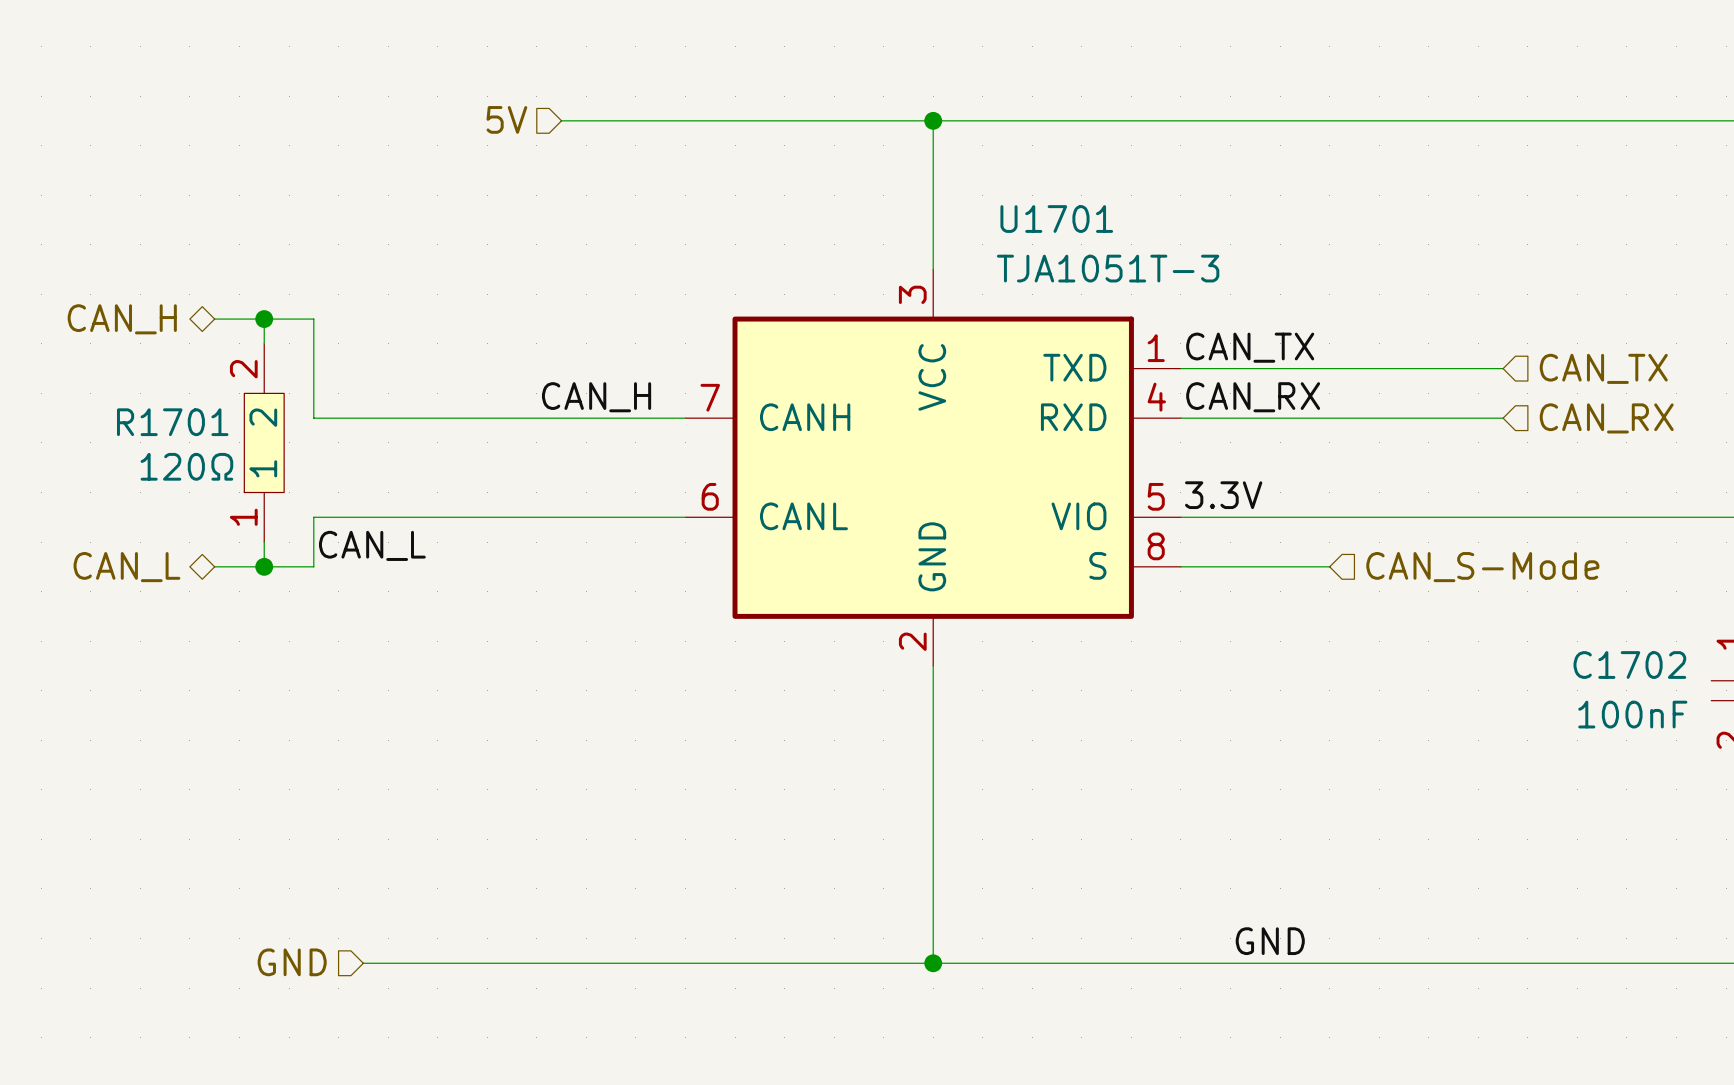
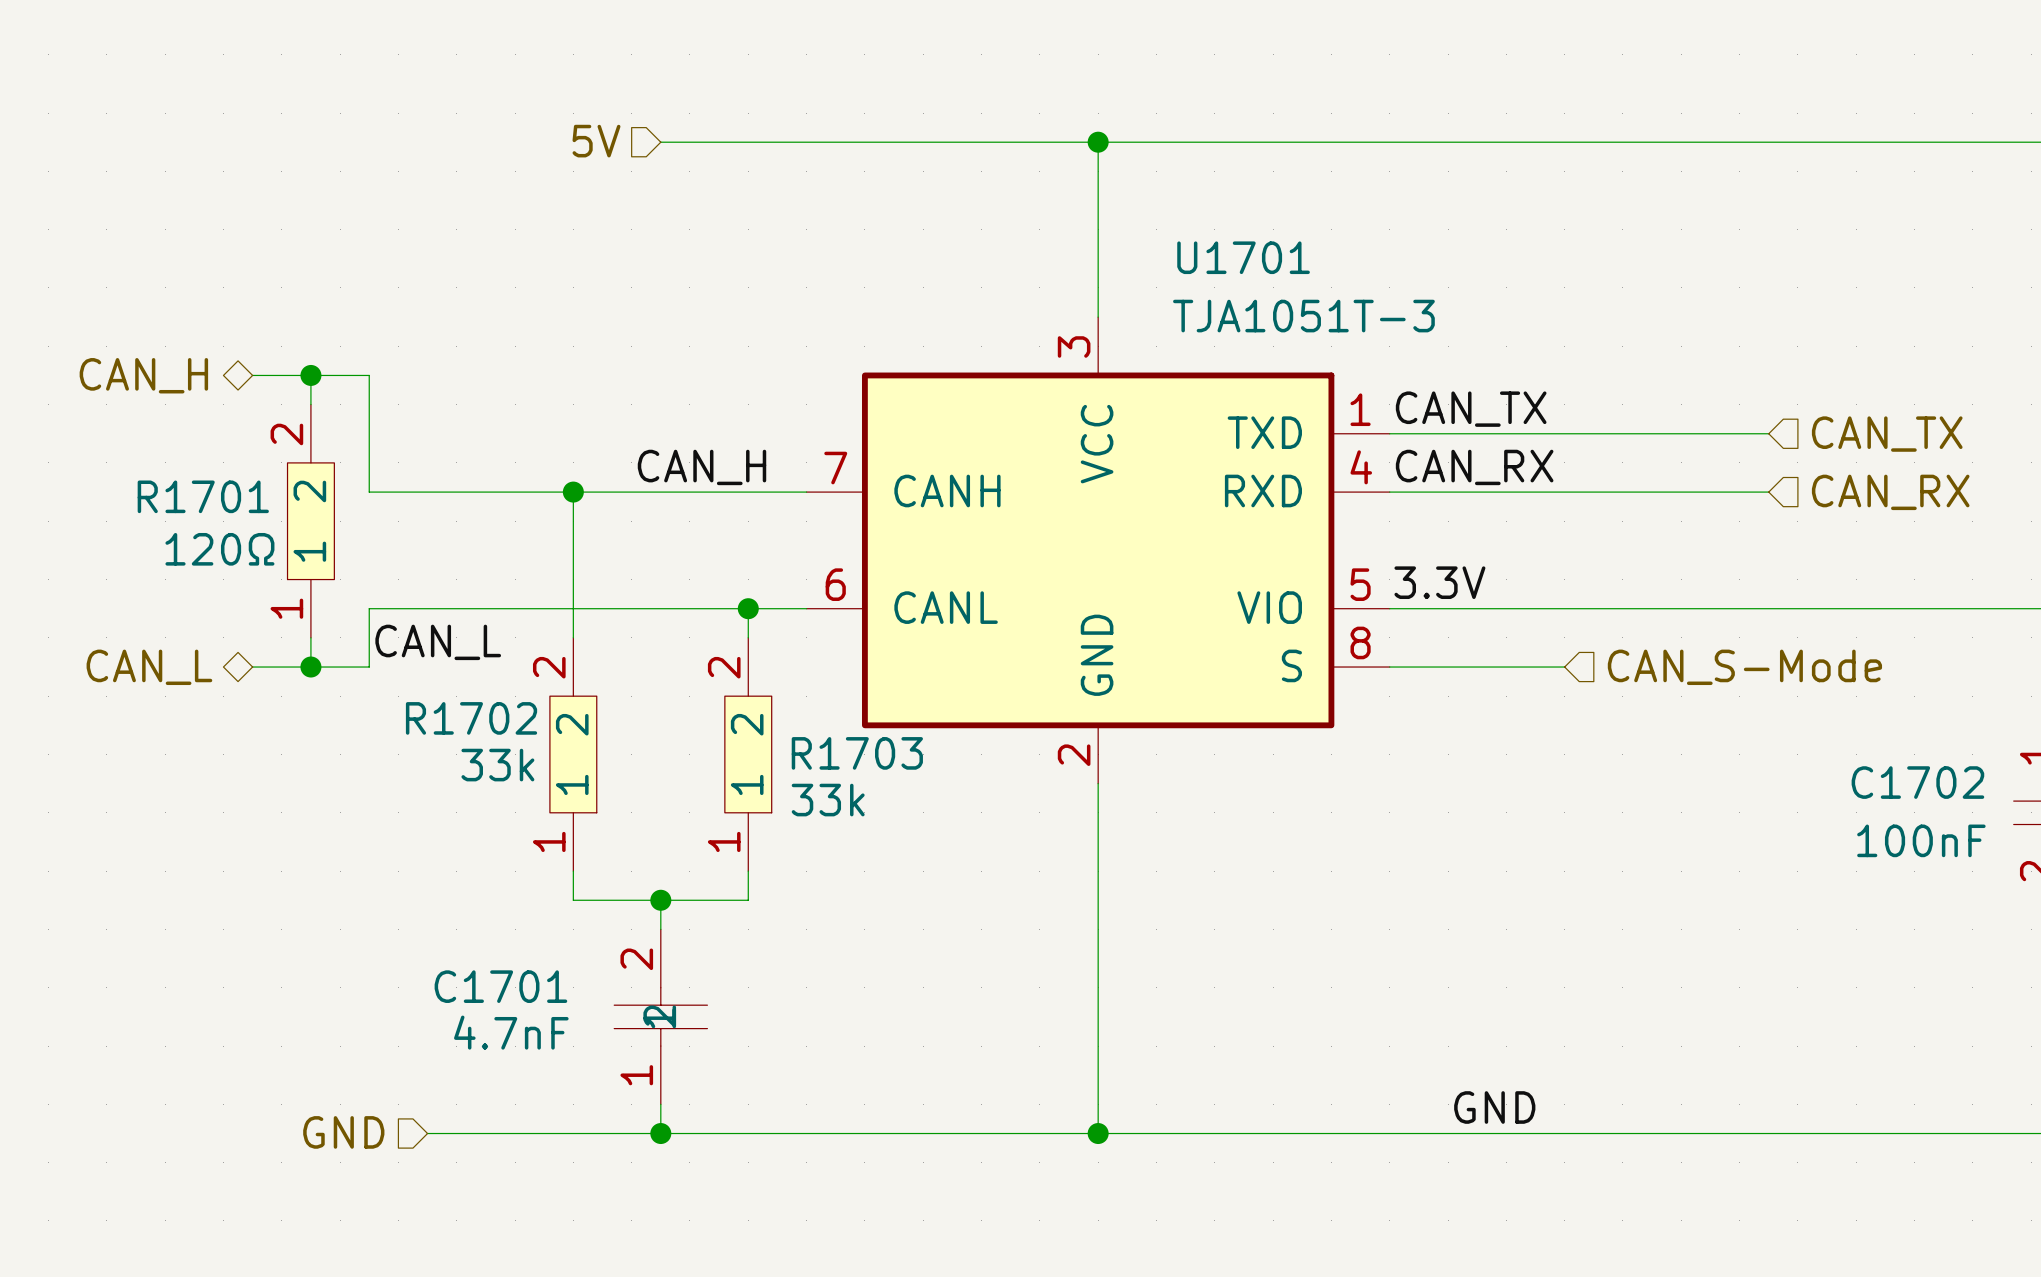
wire: none -> (573, 492) (573, 637)
junction: none -> (573, 492)
wire: none -> (748, 608) (748, 637)
junction: none -> (748, 608)
R1702: none -> 33k (573, 754)
R1703: none -> 33k (748, 754)
wire: none -> (573, 871) (573, 900) (748, 900) (748, 871)
wire: none -> (660, 900) (660, 929)
junction: none -> (660, 900)
C1701: none -> 4.7nF (660, 1016)
wire: none -> (660, 1104) (660, 1133)
junction: none -> (660, 1133)

